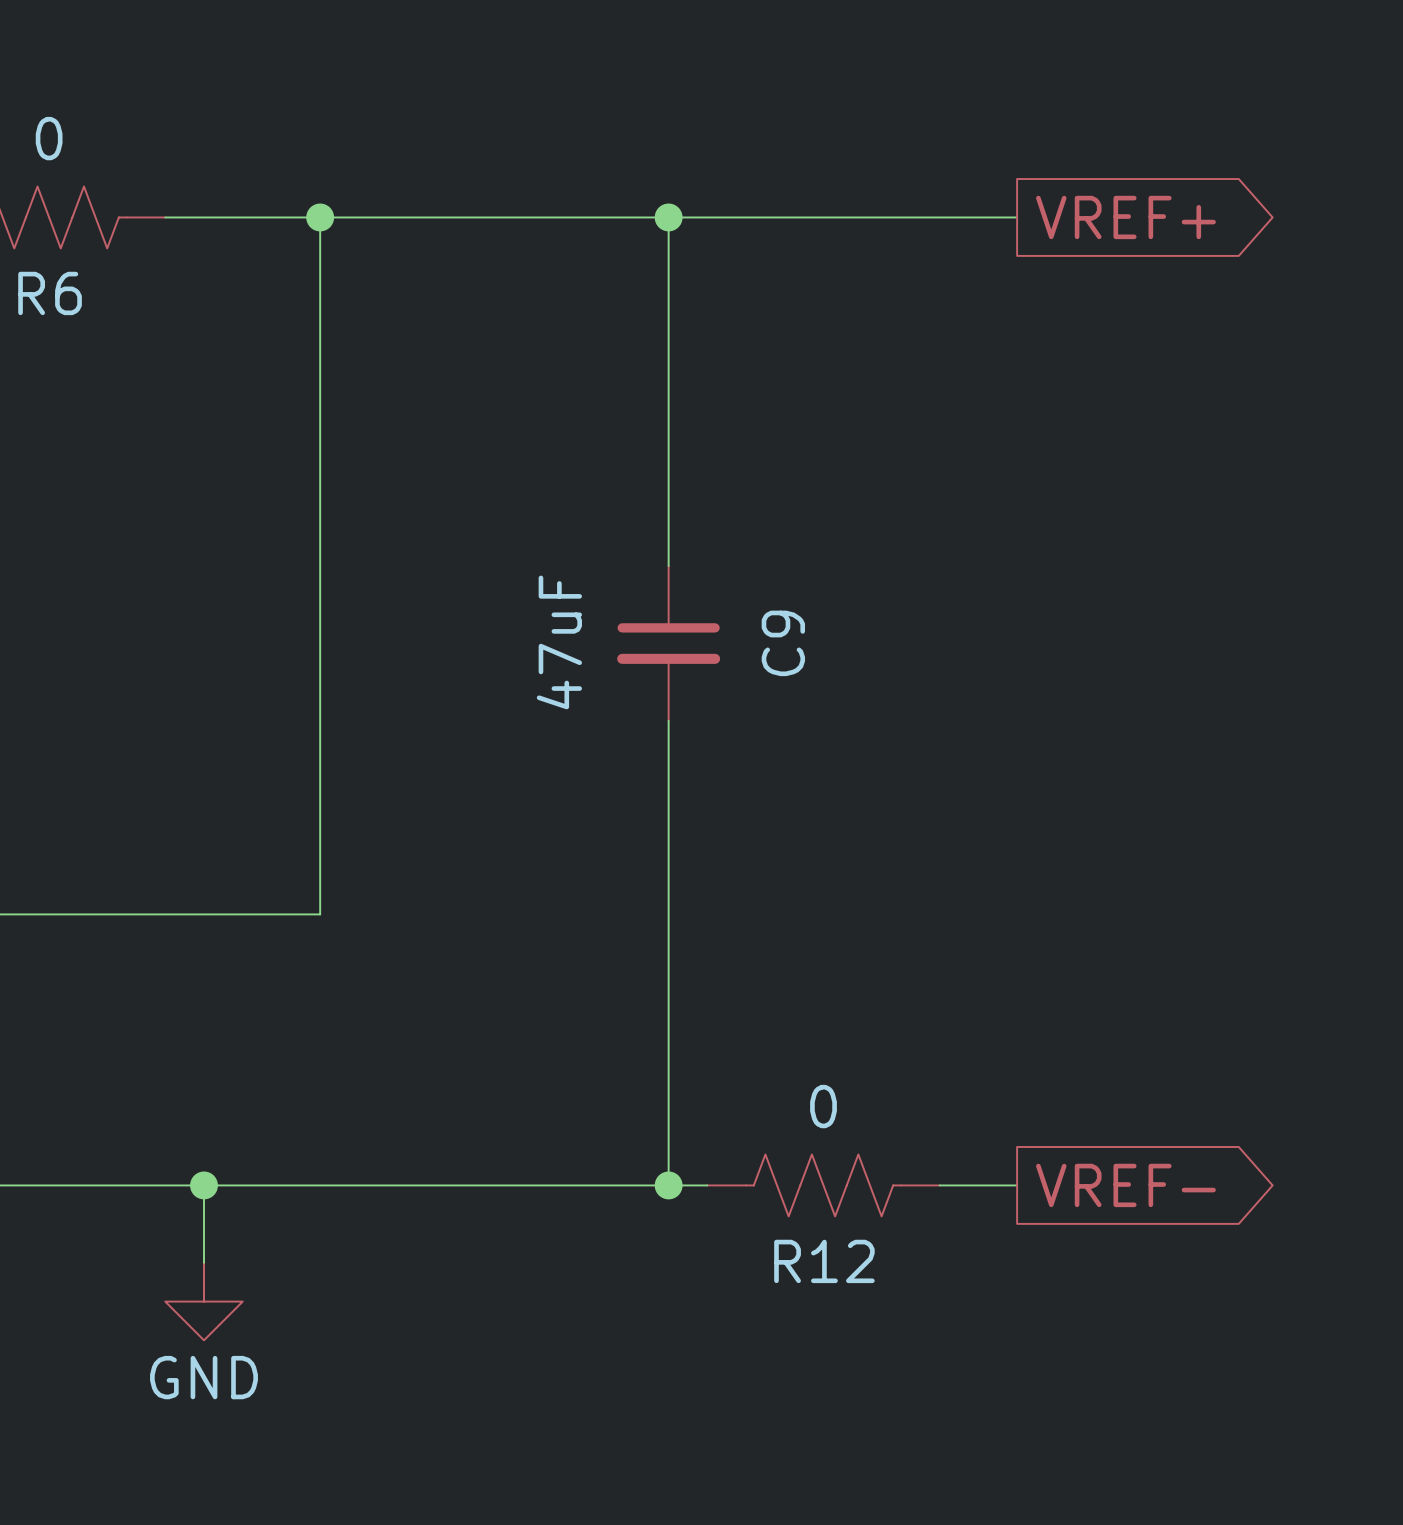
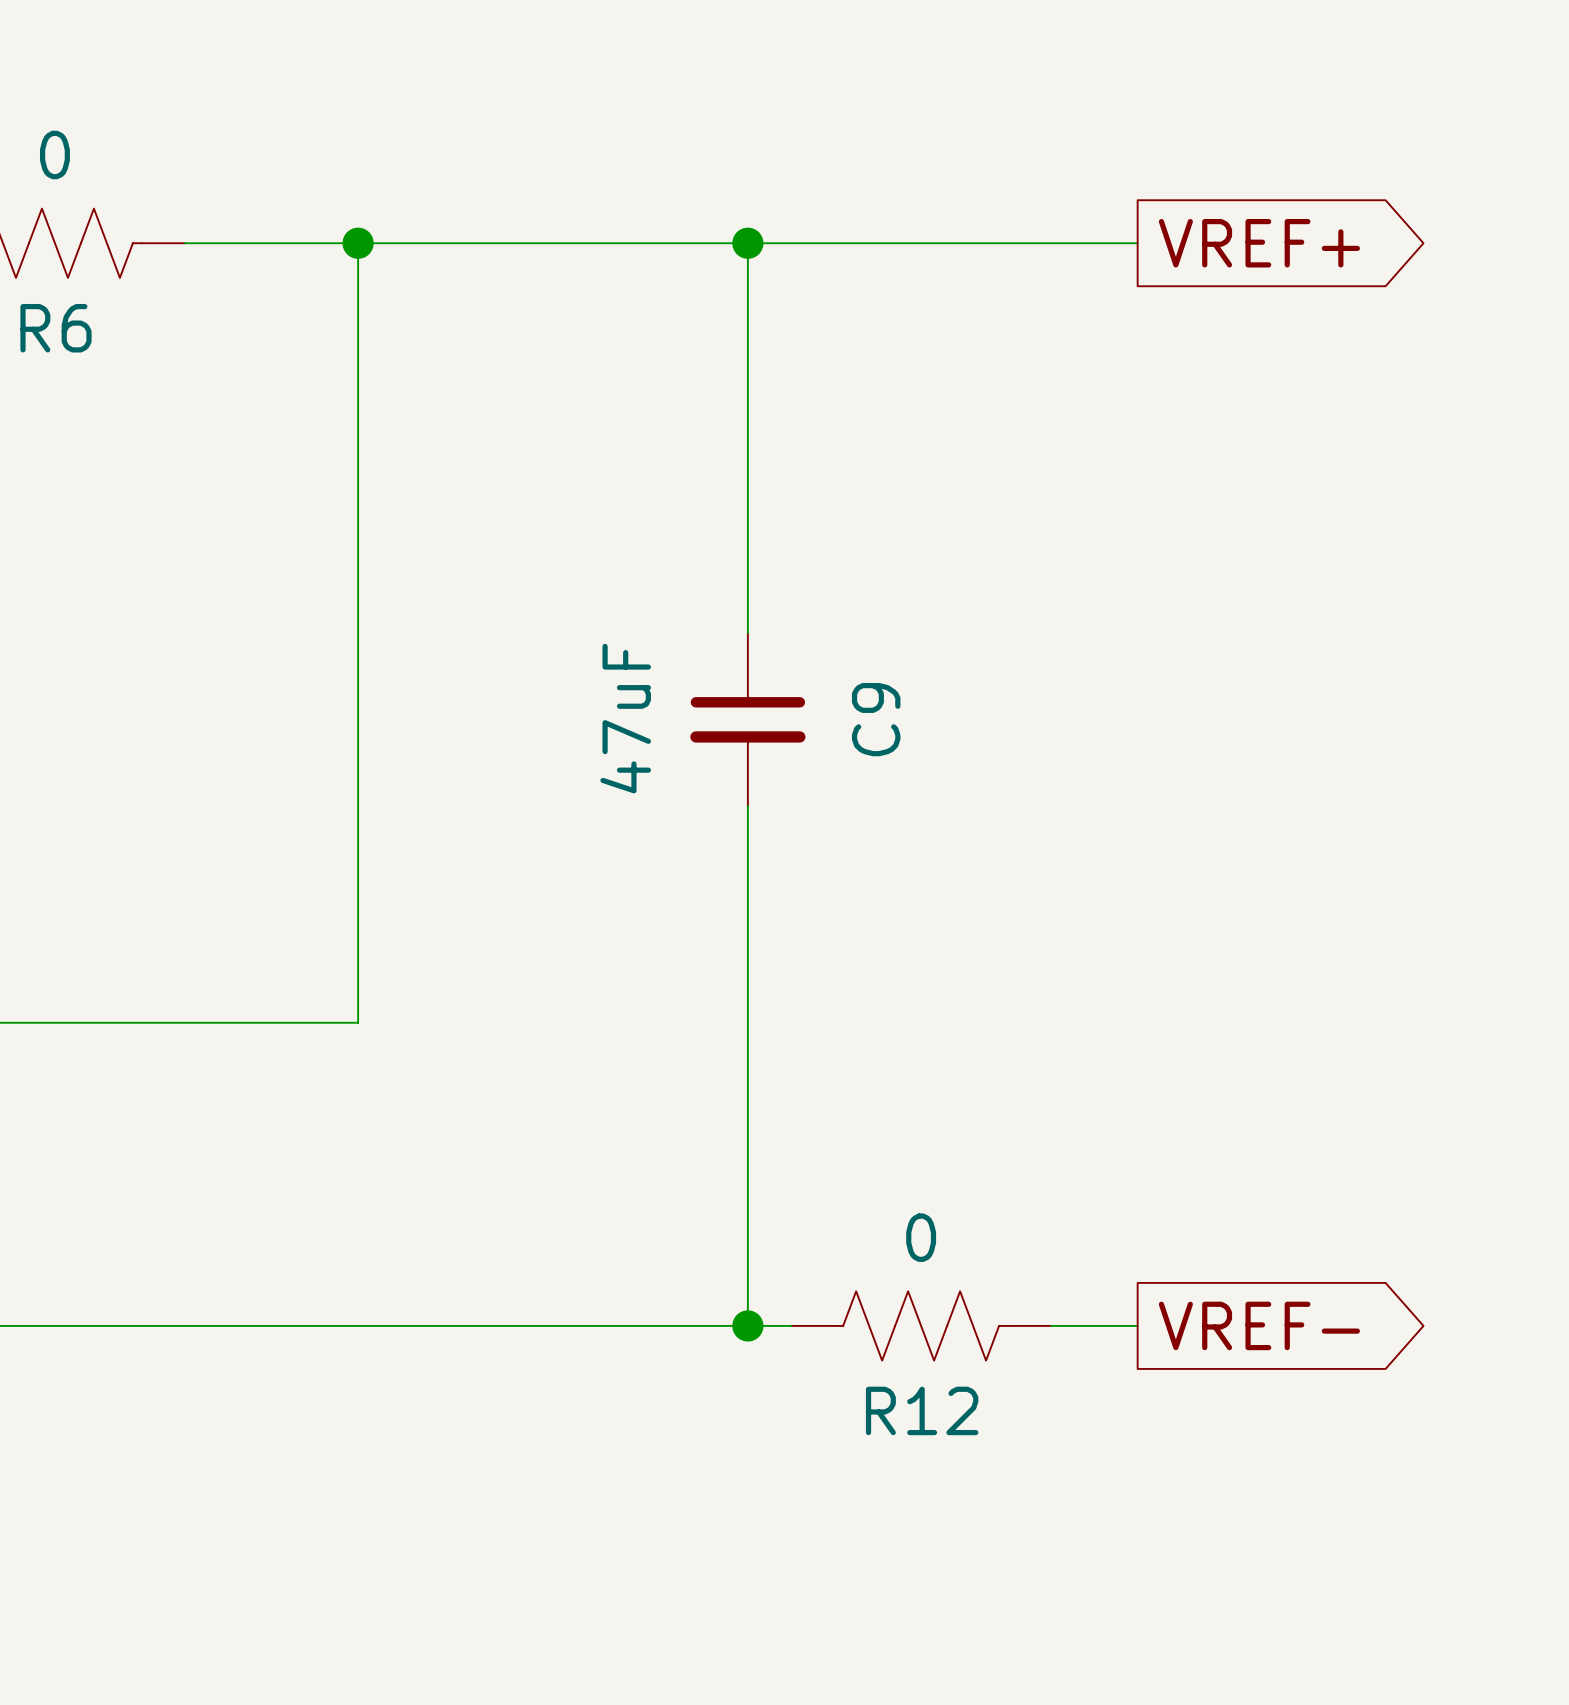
wire: (204, 1185) (204, 1262) -> none
junction: (204, 1185) -> none
power symbol: GND (204, 1301) -> none

